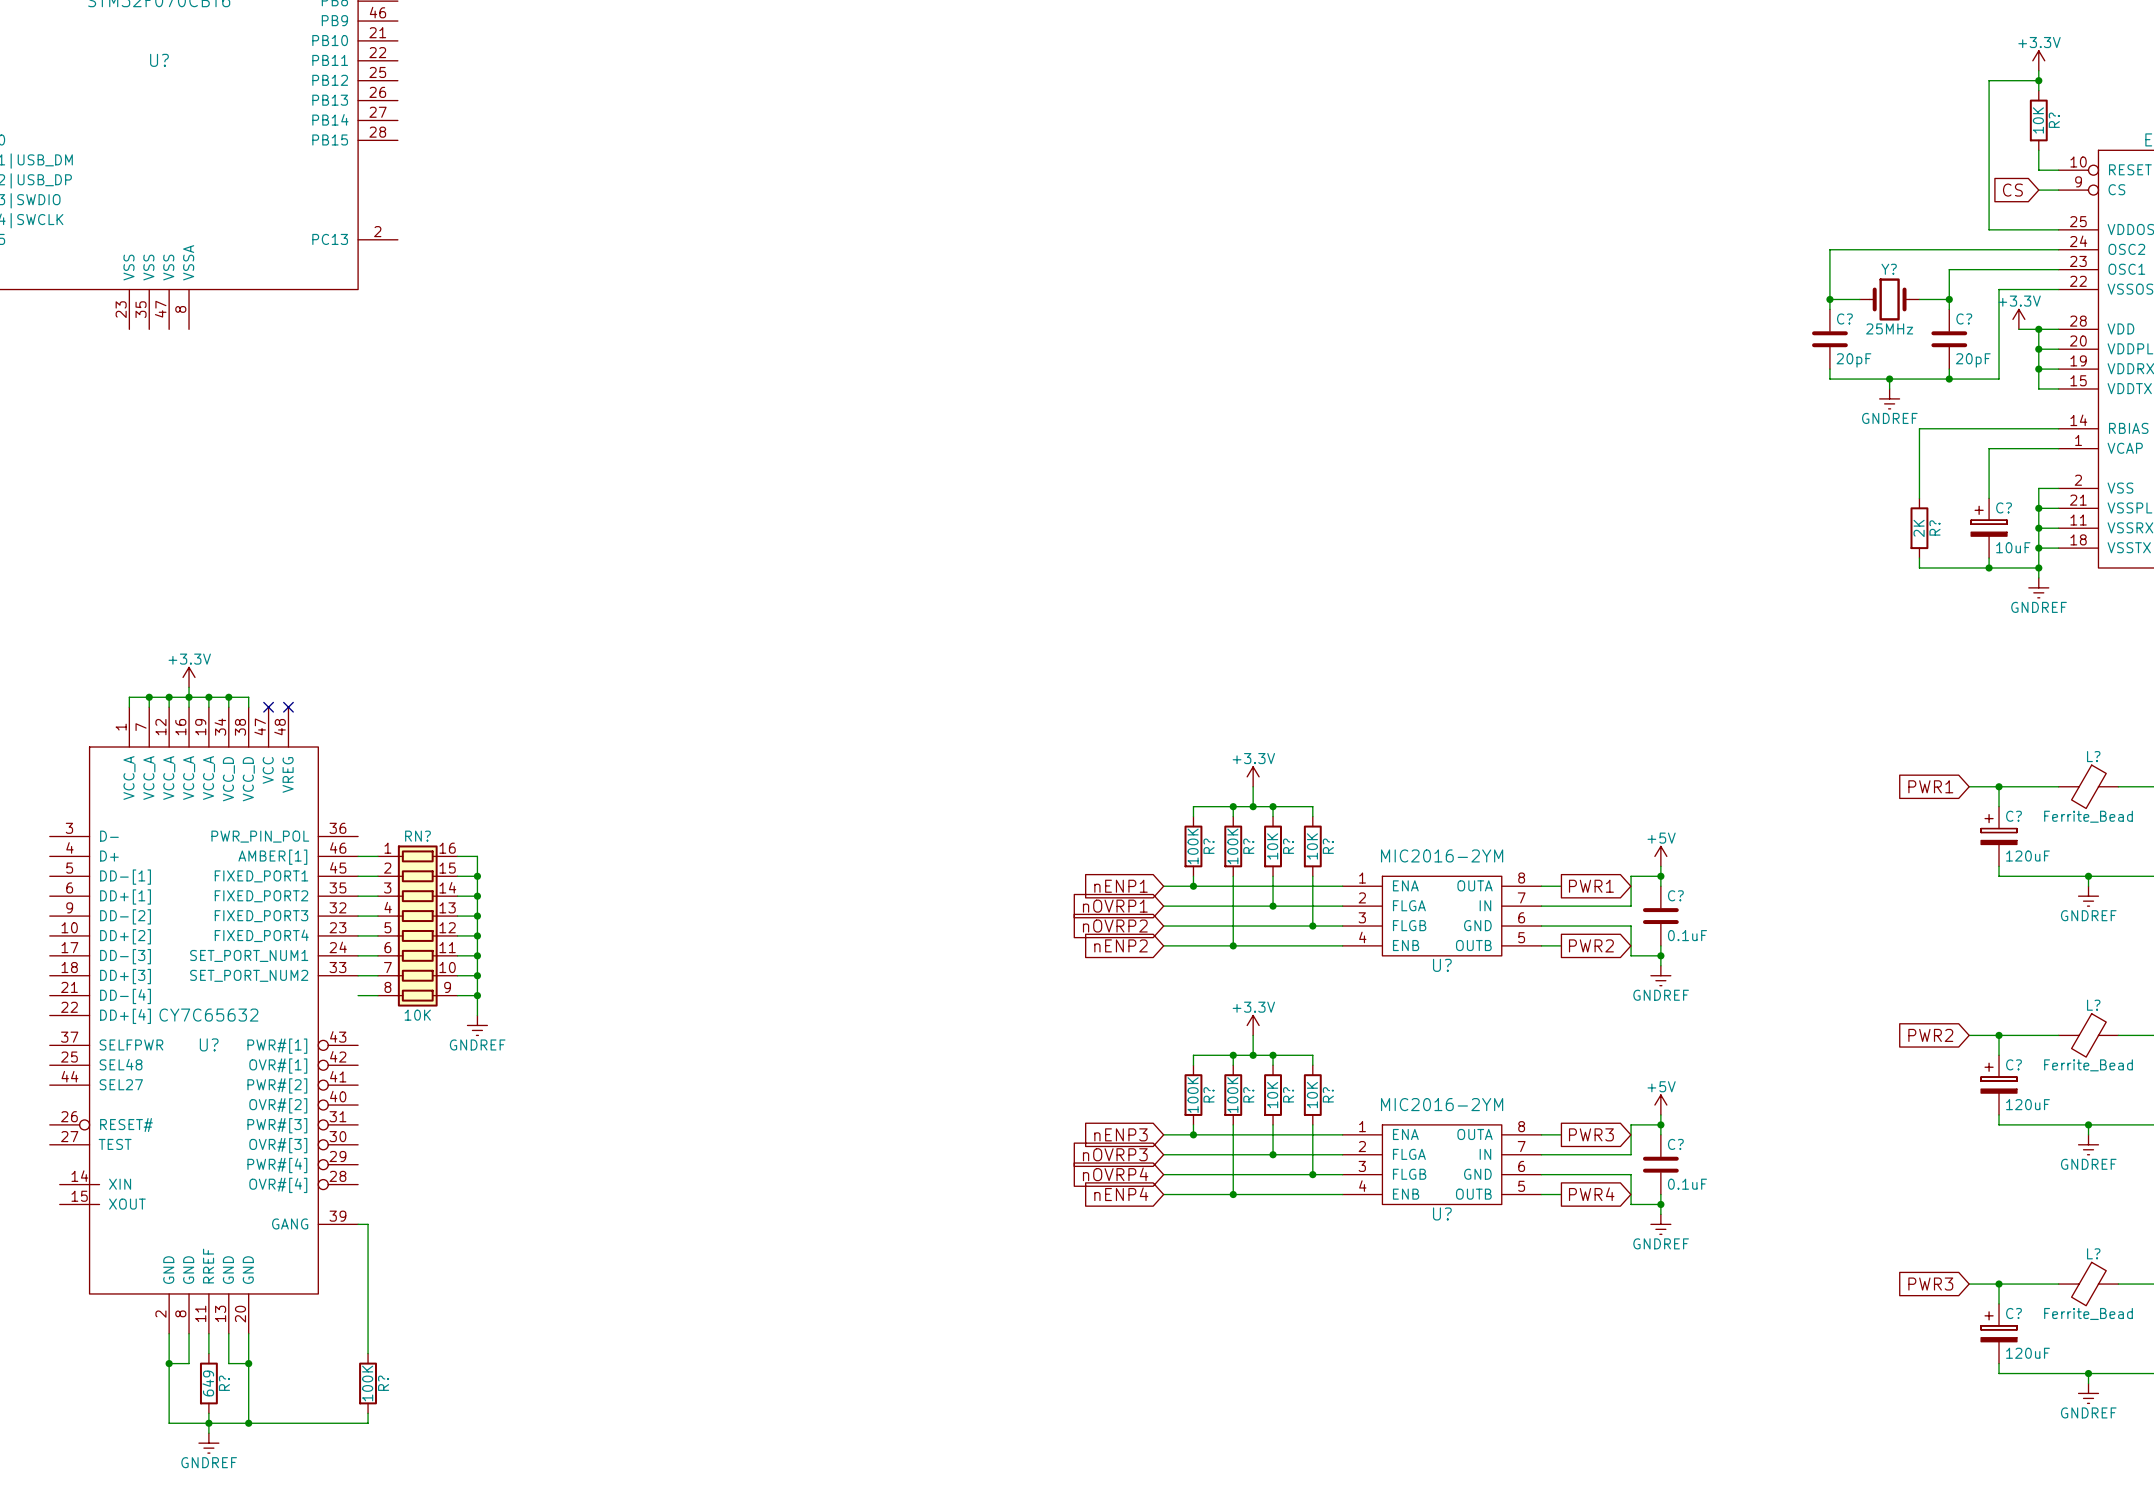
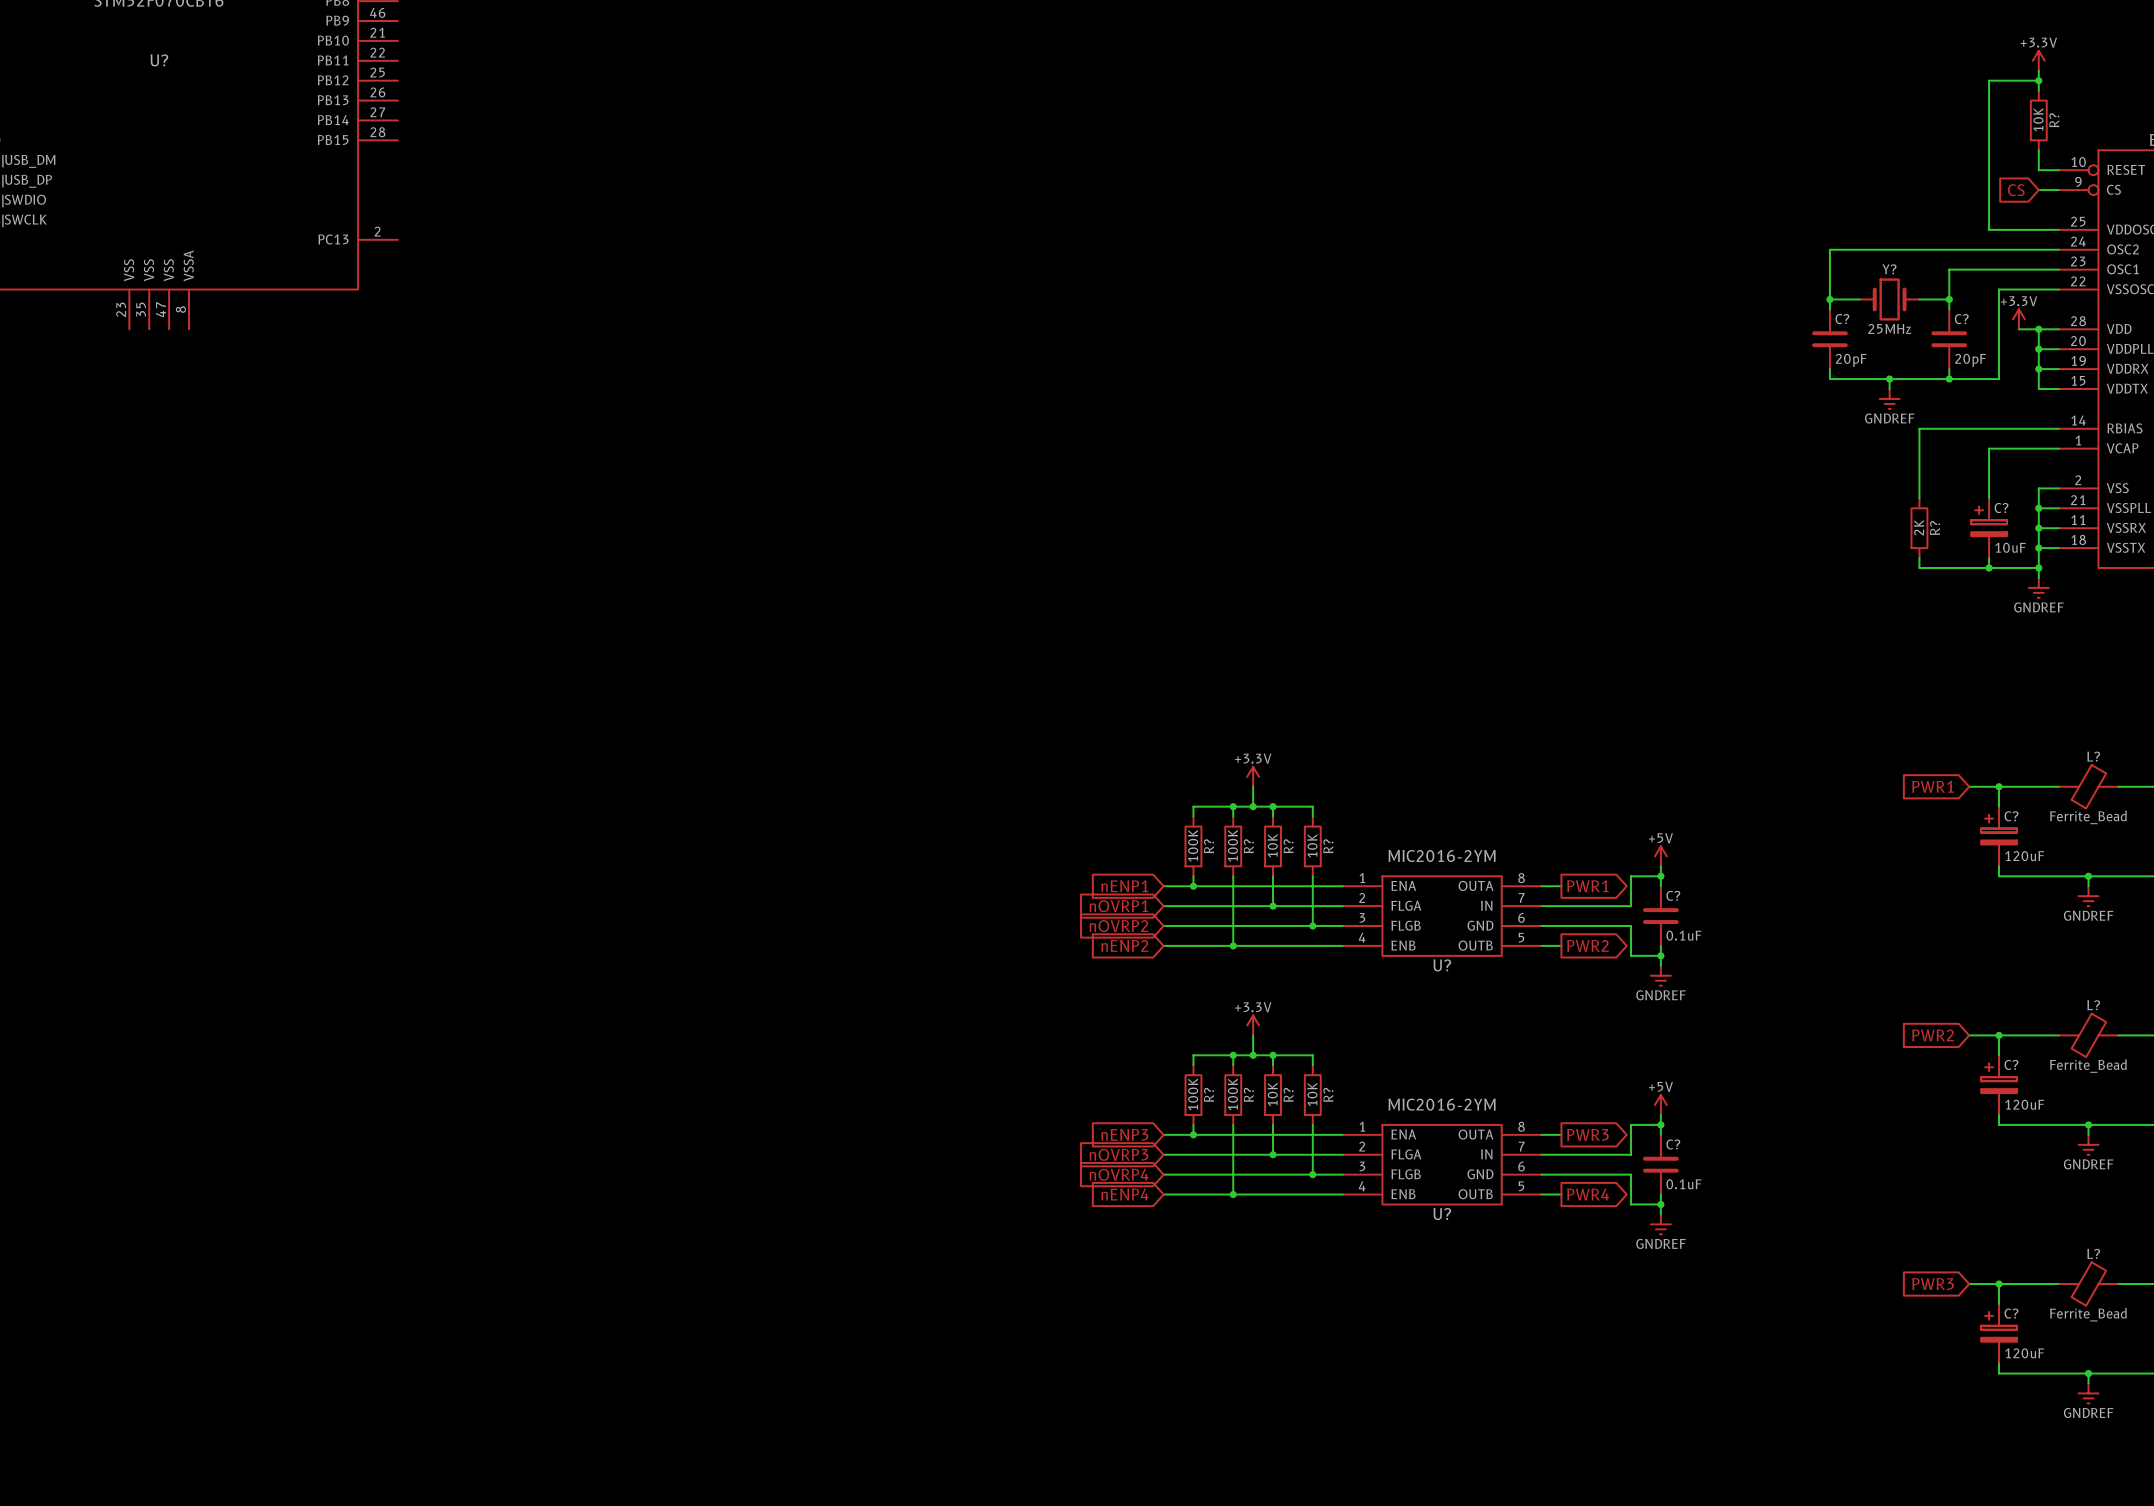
power symbol: +3.3V (189, 677) -> none
wire: (189, 687) (189, 707) -> none
wire: (149, 697) (149, 707) -> none
junction: (149, 697) -> none
wire: (169, 697) (169, 707) -> none
junction: (169, 697) -> none
junction: (189, 697) -> none
wire: (208, 697) (208, 707) -> none
junction: (208, 697) -> none
wire: (228, 697) (228, 707) -> none
junction: (228, 697) -> none
wire: (129, 707) (129, 697) (248, 697) (248, 707) -> none
no-connect mark: (268, 707) -> none
no-connect mark: (288, 707) -> none
wire: (358, 856) (377, 856) -> none
wire: (457, 856) (477, 856) (477, 1015) -> none
wire: (358, 876) (377, 876) -> none
wire: (457, 876) (477, 876) -> none
junction: (477, 876) -> none
wire: (358, 896) (377, 896) -> none
wire: (457, 896) (477, 896) -> none
junction: (477, 896) -> none
wire: (358, 916) (377, 916) -> none
wire: (457, 916) (477, 916) -> none
junction: (477, 916) -> none
RN?: 10K (417, 926) -> none
wire: (358, 935) (377, 935) -> none
wire: (457, 935) (477, 935) -> none
junction: (477, 935) -> none
wire: (358, 955) (377, 955) -> none
wire: (457, 955) (477, 955) -> none
junction: (477, 955) -> none
wire: (358, 975) (377, 975) -> none
wire: (457, 975) (477, 975) -> none
junction: (477, 975) -> none
wire: (358, 995) (377, 995) -> none
wire: (457, 995) (477, 995) -> none
junction: (477, 995) -> none
U?: CY7C65632 (203, 1020) -> none
power symbol: GNDREF (477, 1025) -> none
wire: (358, 1224) (368, 1224) (368, 1353) -> none
wire: (169, 1333) (169, 1423) (368, 1423) (368, 1413) -> none
wire: (189, 1333) (189, 1363) (169, 1363) -> none
wire: (208, 1333) (208, 1353) -> none
wire: (228, 1333) (228, 1363) (248, 1363) -> none
wire: (248, 1333) (248, 1423) -> none
junction: (169, 1363) -> none
junction: (248, 1363) -> none
R?: 649 (208, 1383) -> none
R?: 100K (368, 1383) -> none
wire: (208, 1413) (208, 1433) -> none
junction: (208, 1423) -> none
junction: (248, 1423) -> none
power symbol: GNDREF (208, 1443) -> none

